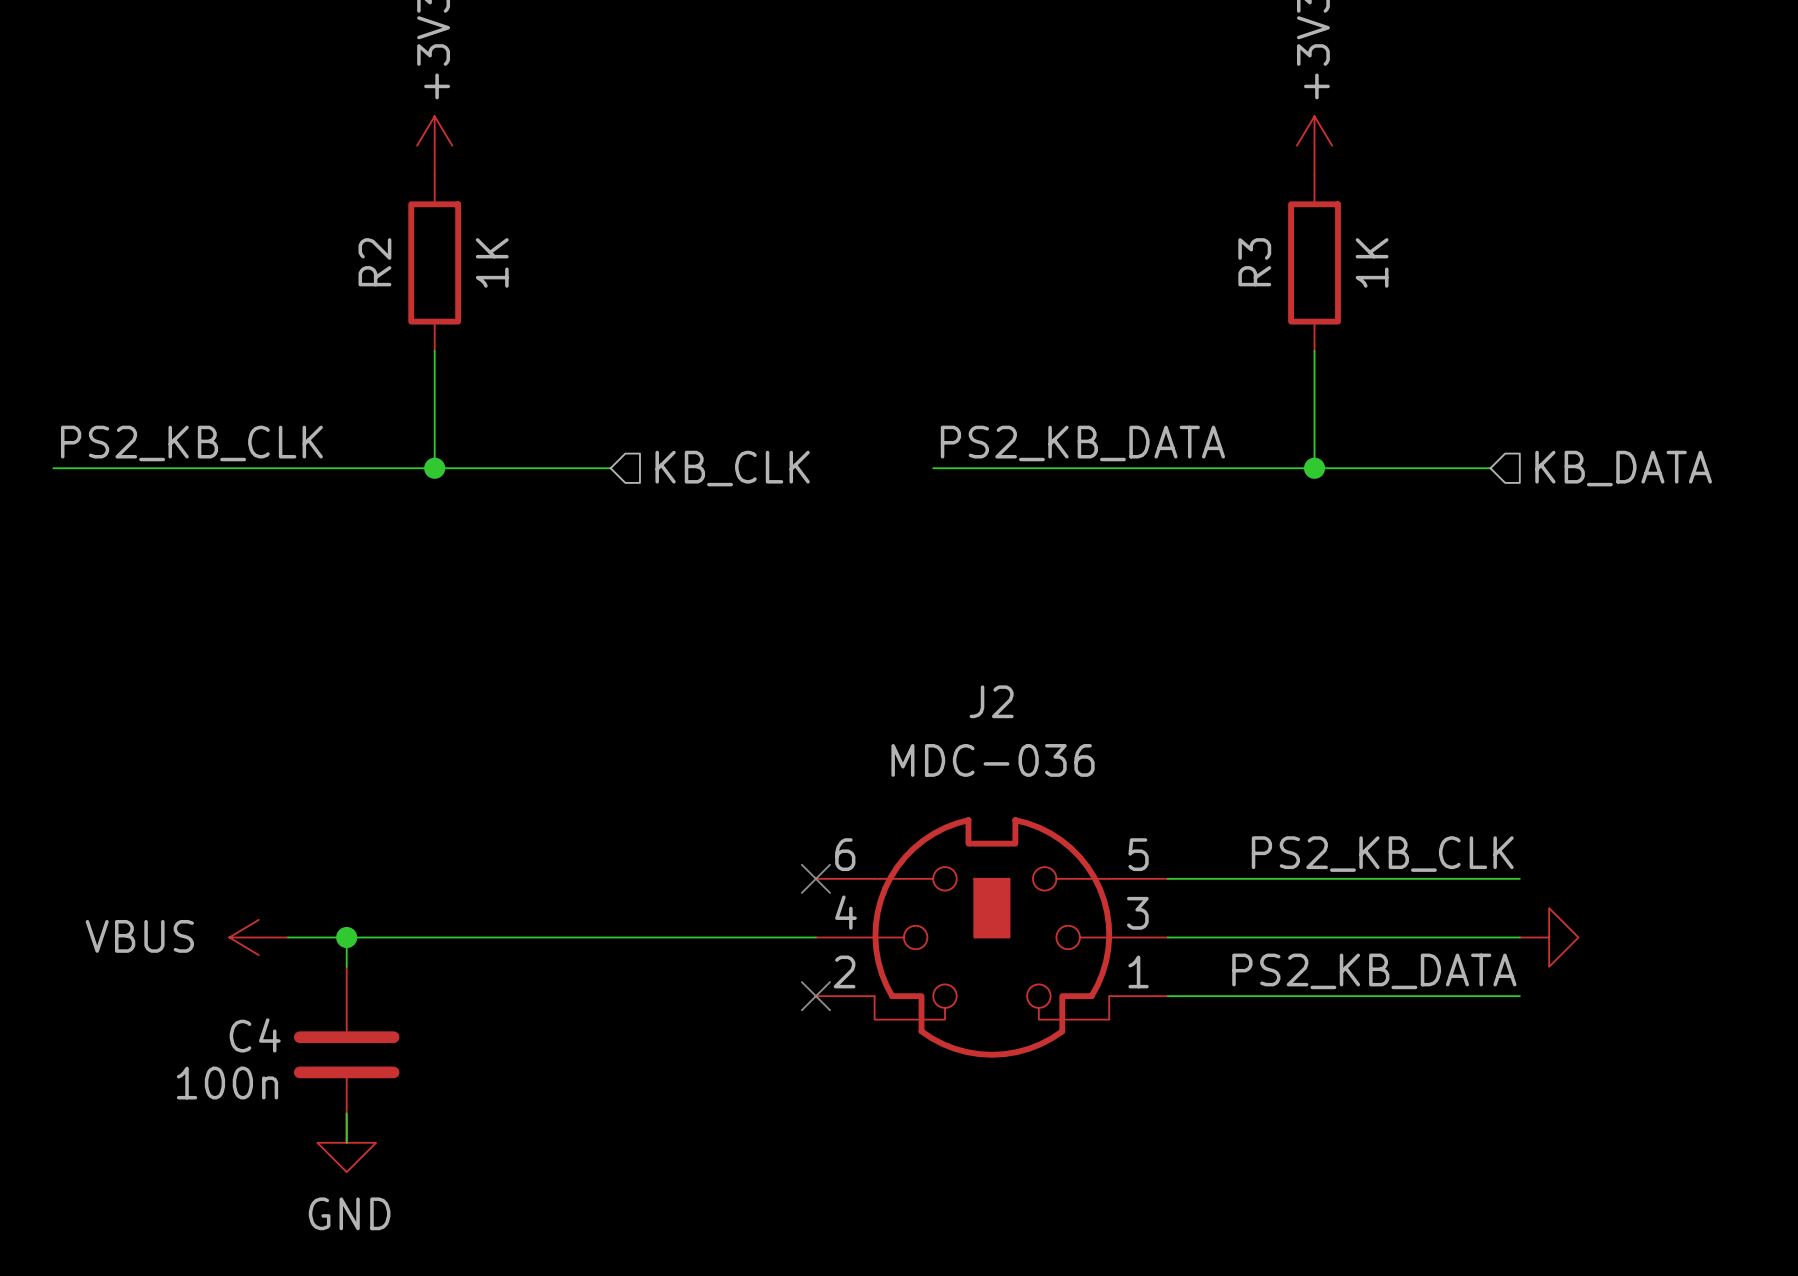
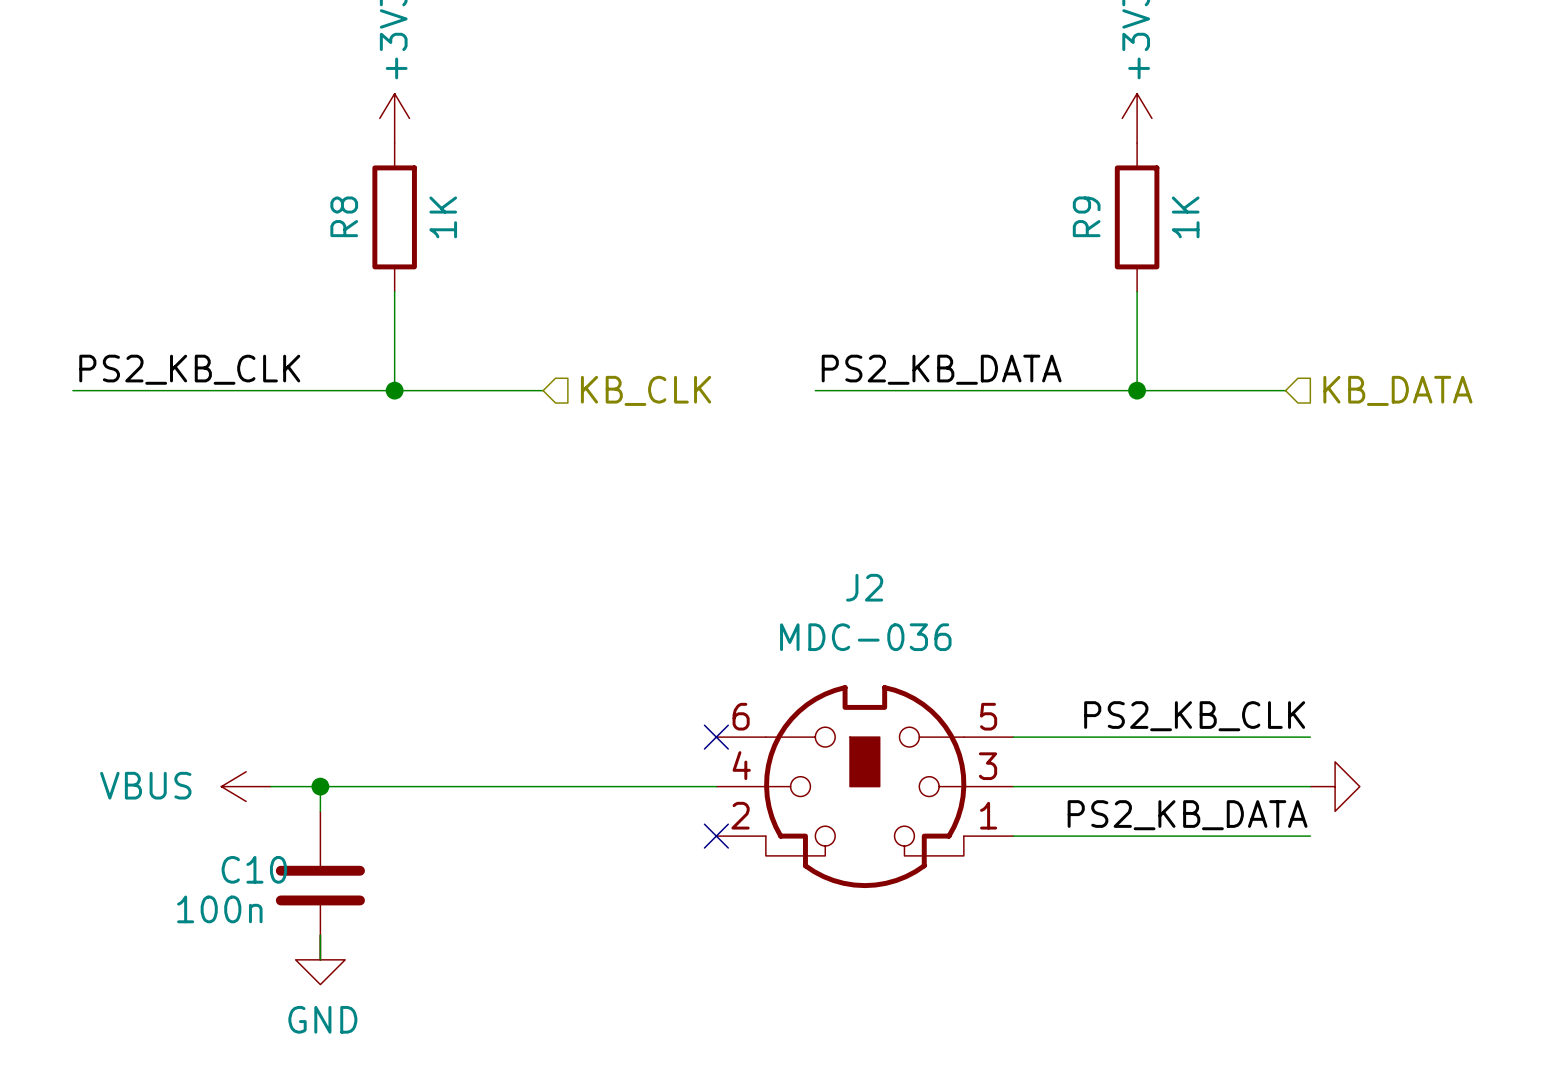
R2 name: R2 (374, 262) -> R8 (344, 216)
R3 name: R3 (1254, 262) -> R9 (1086, 216)
C4 name: C4 (255, 1035) -> C10 (254, 869)

